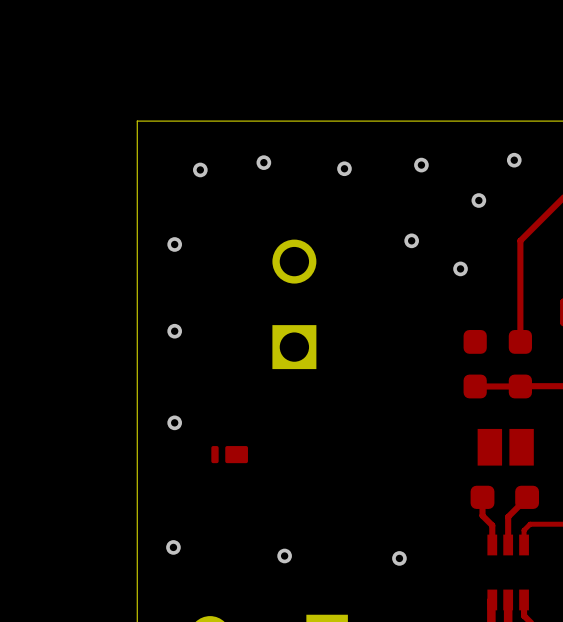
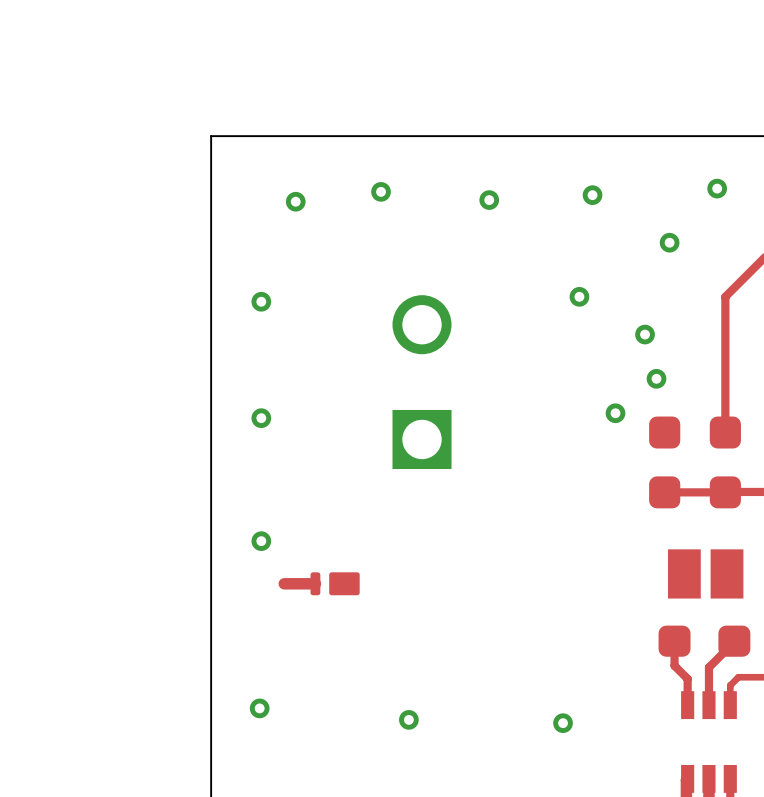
via: none -> (656, 378)
via: none -> (615, 413)
top track: none -> (315, 583) (284, 583)

